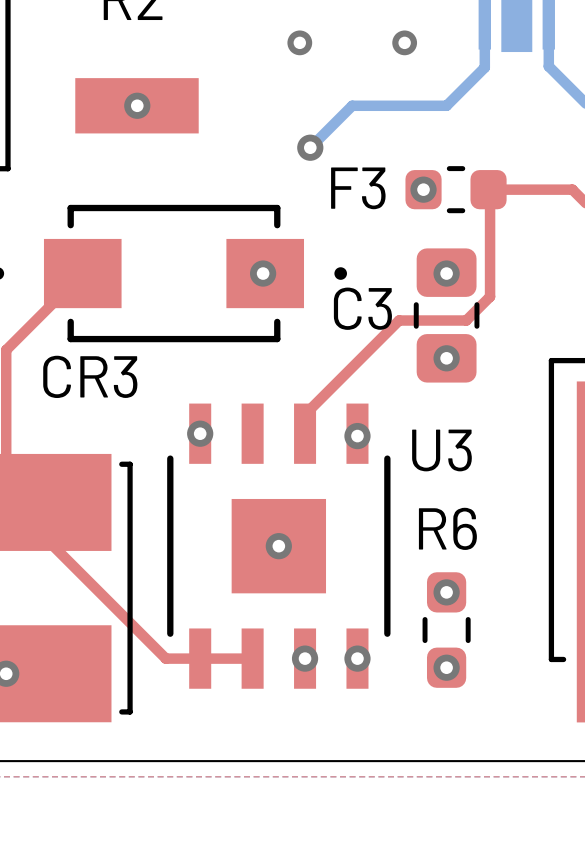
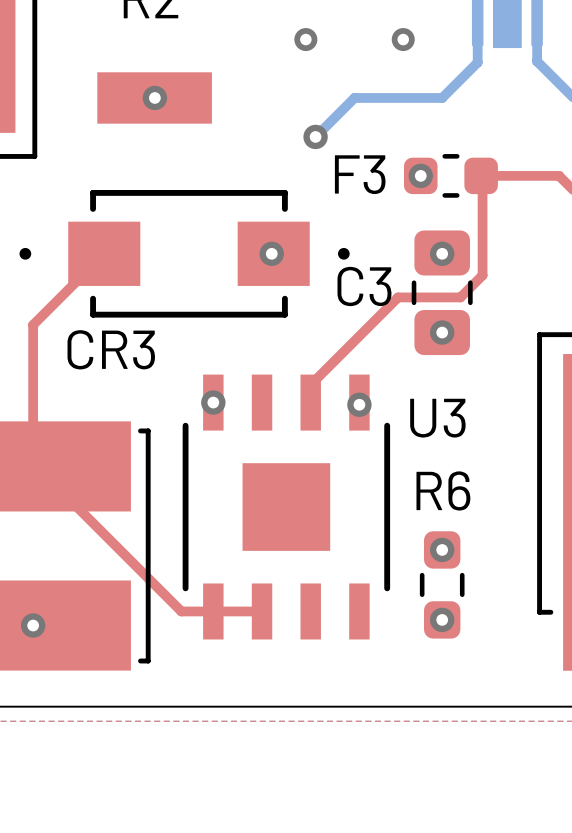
via: (278, 546) -> none
via: (305, 658) -> none
via: (357, 658) -> none

